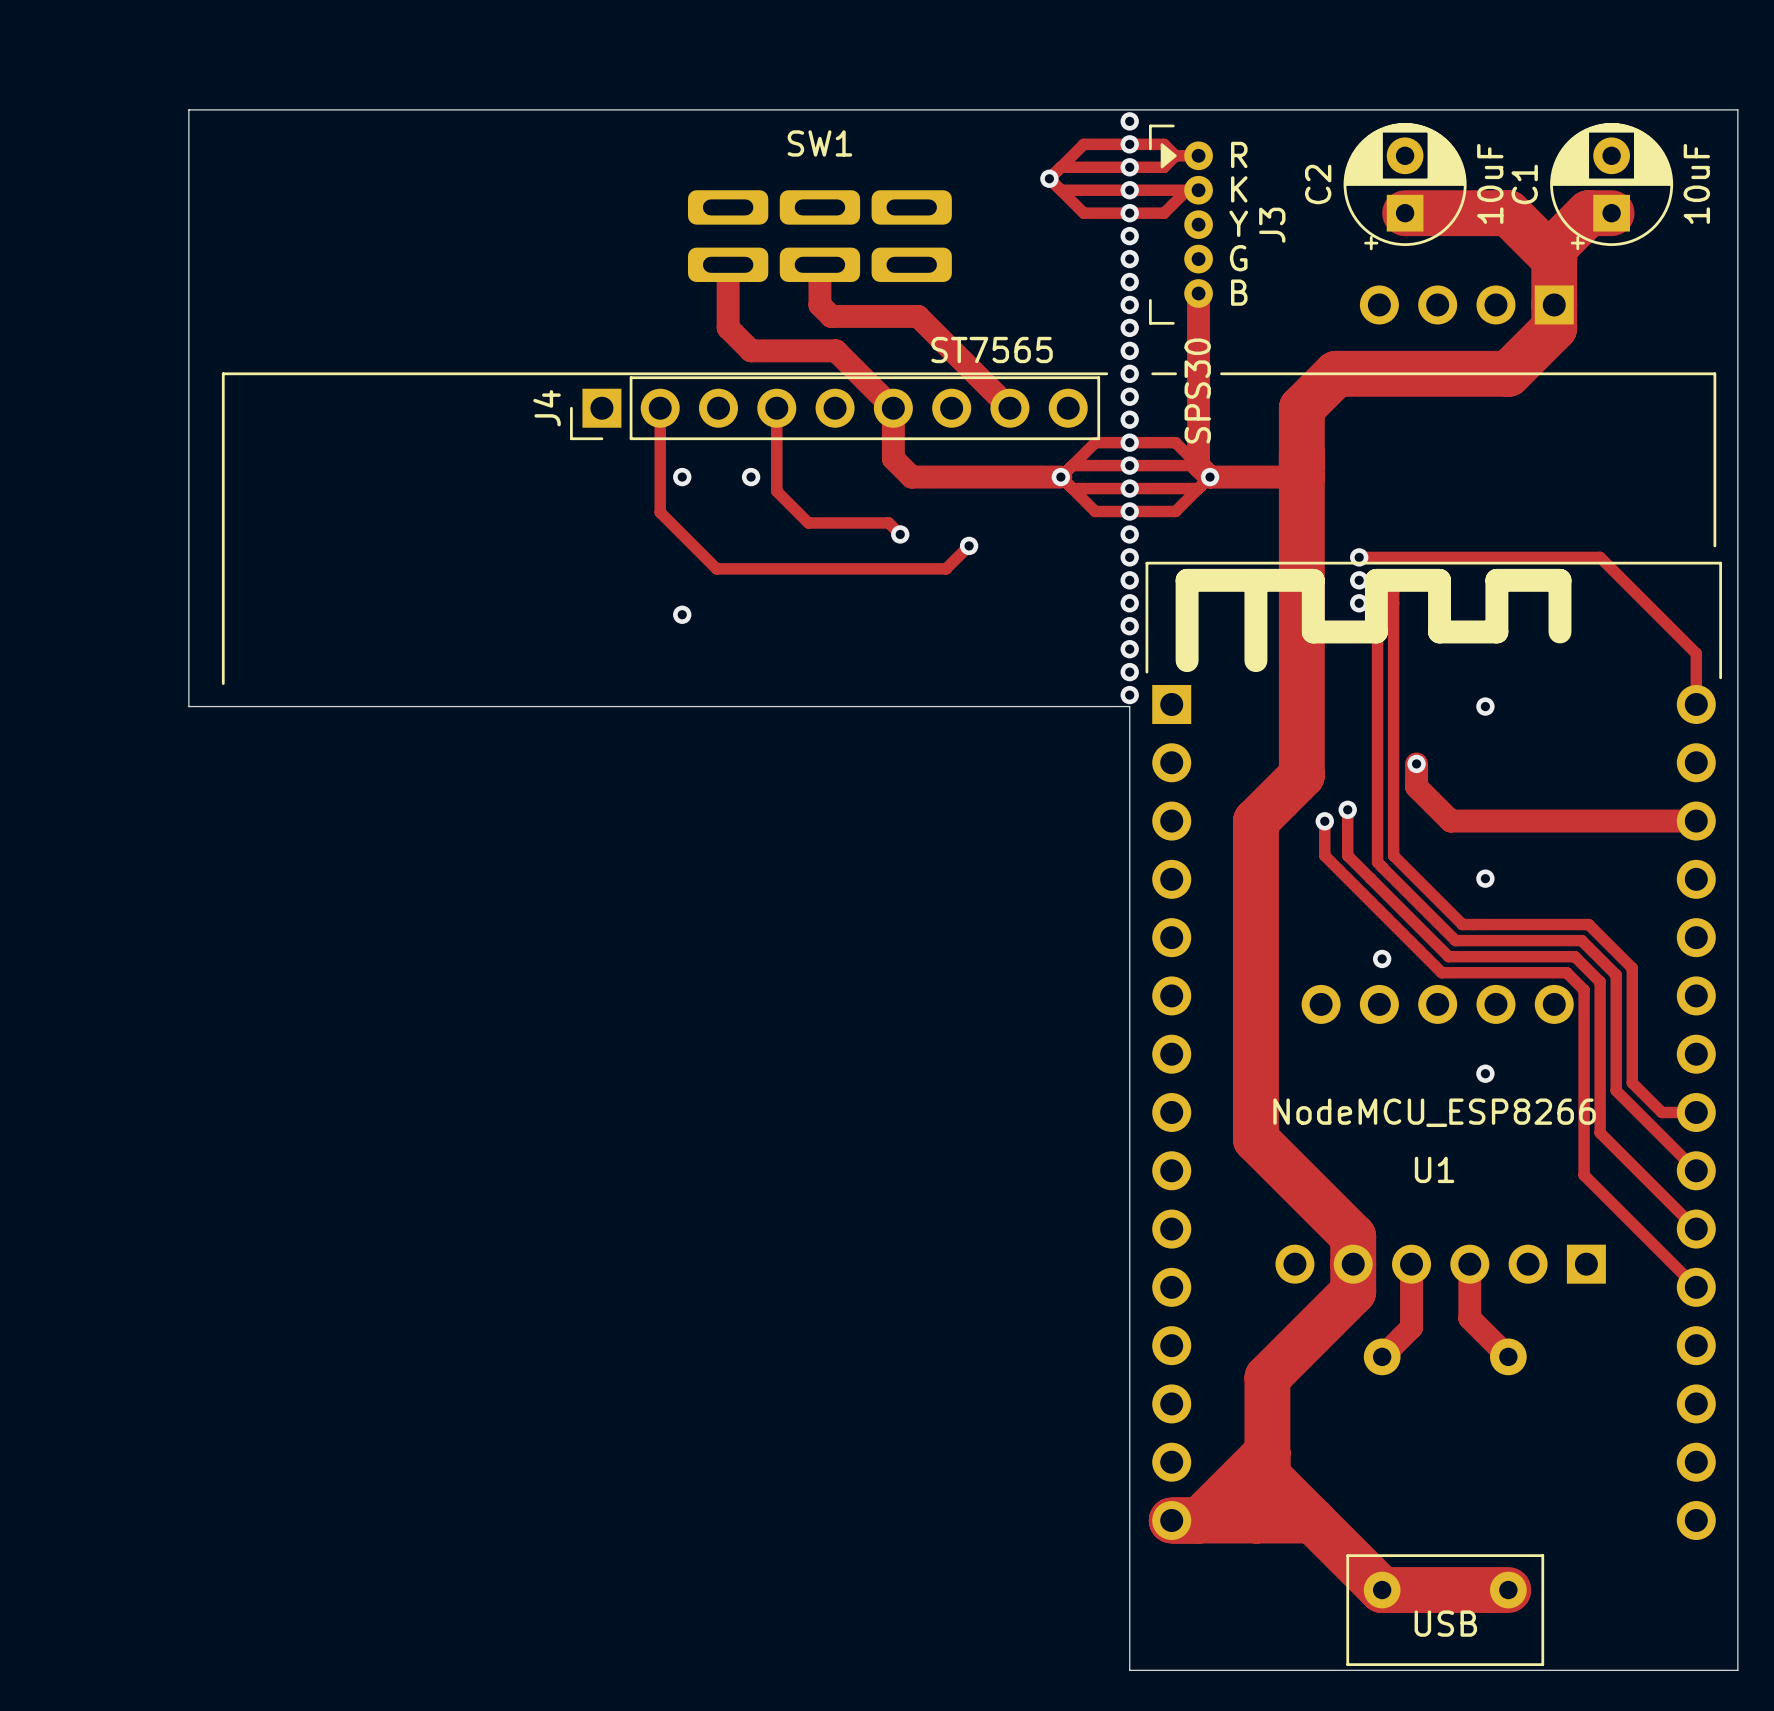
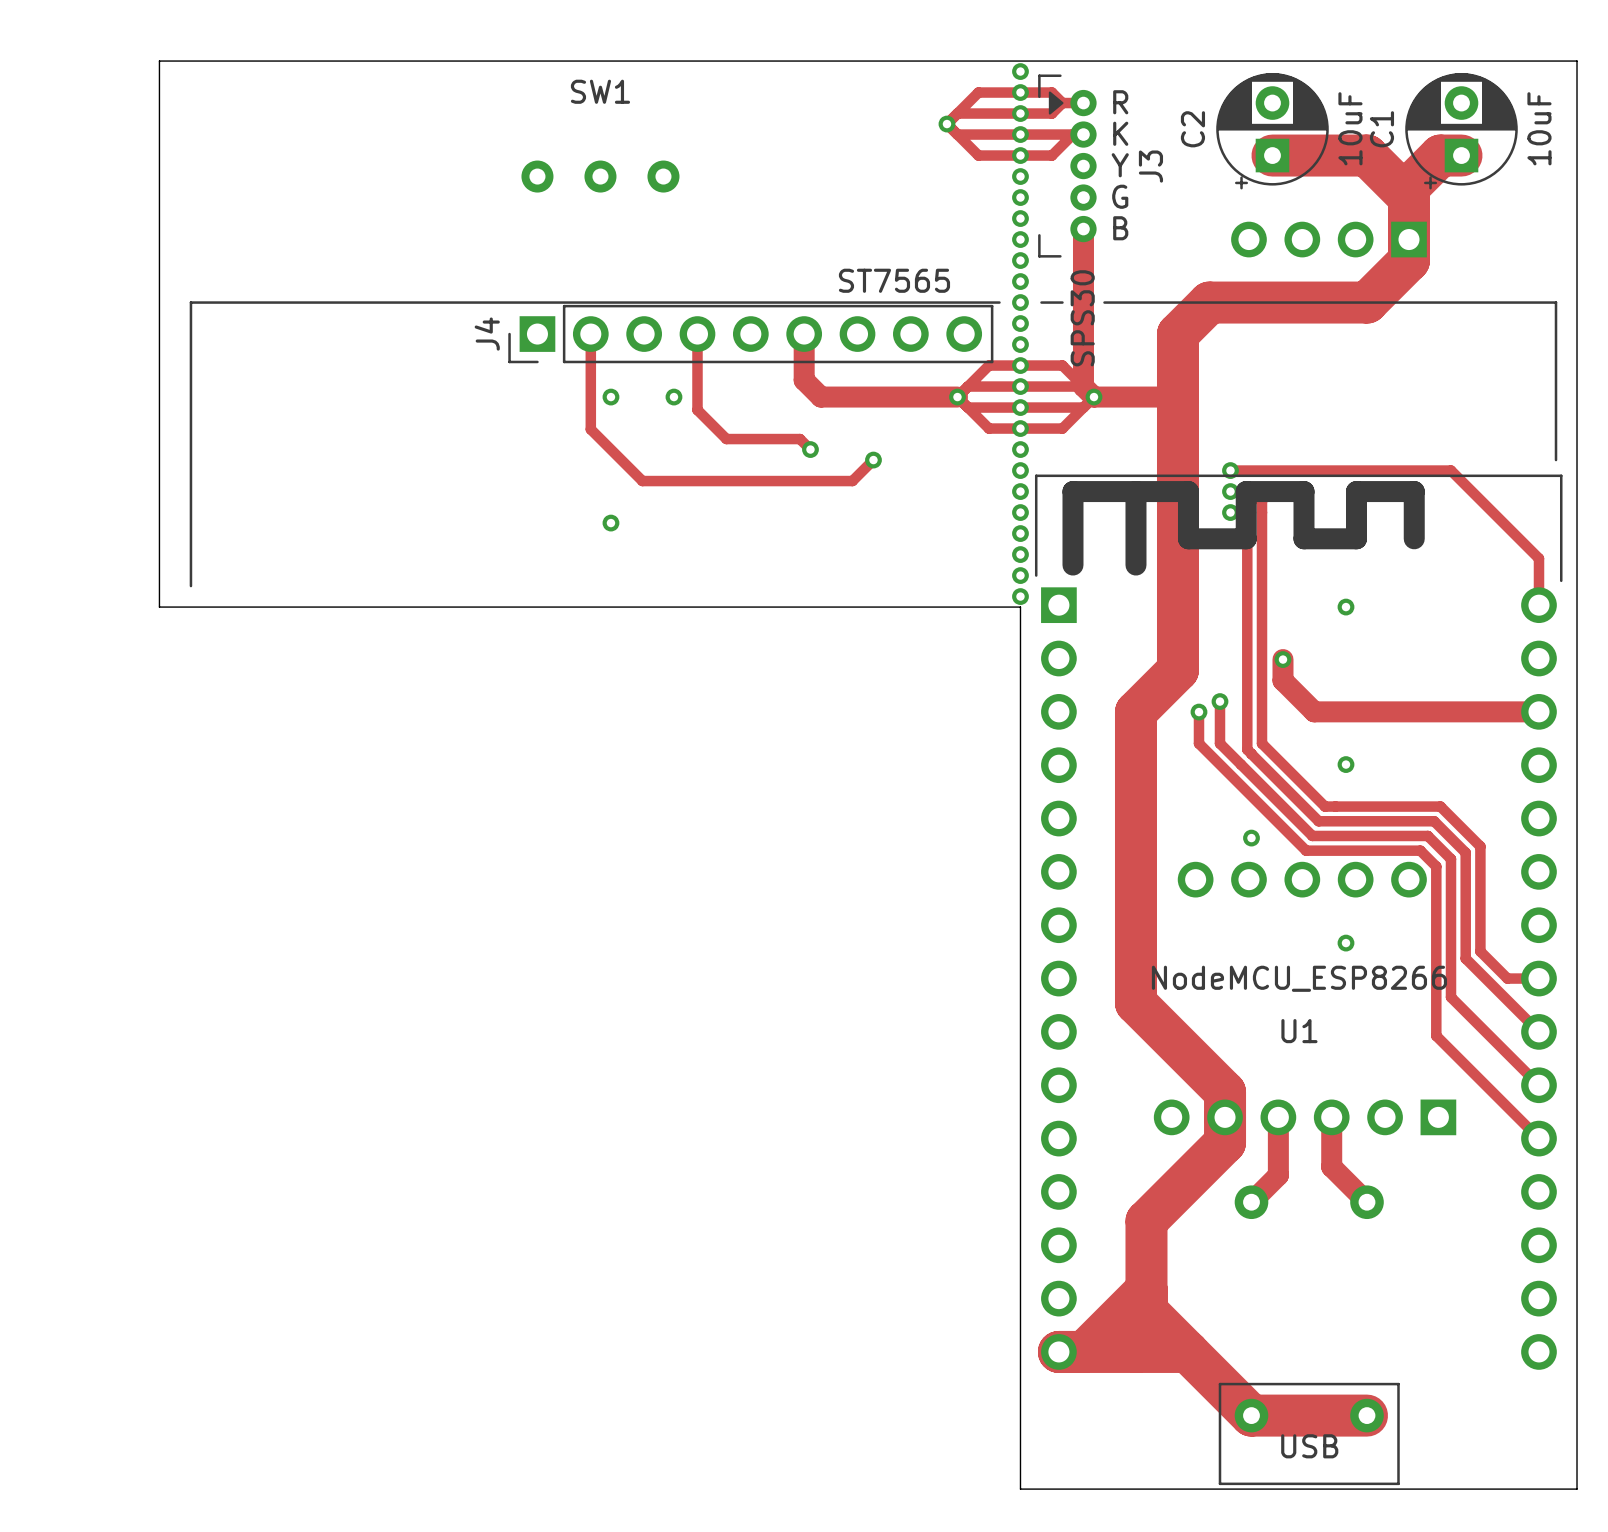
SW1 footprint: [687, 190, 952, 283] -> [521, 160, 680, 193]
track: (728, 264) (728, 327) (751, 350) (835, 350) (893, 408) -> none
track: (819, 264) (819, 304) (831, 316) (918, 316) (1009, 408) -> none

